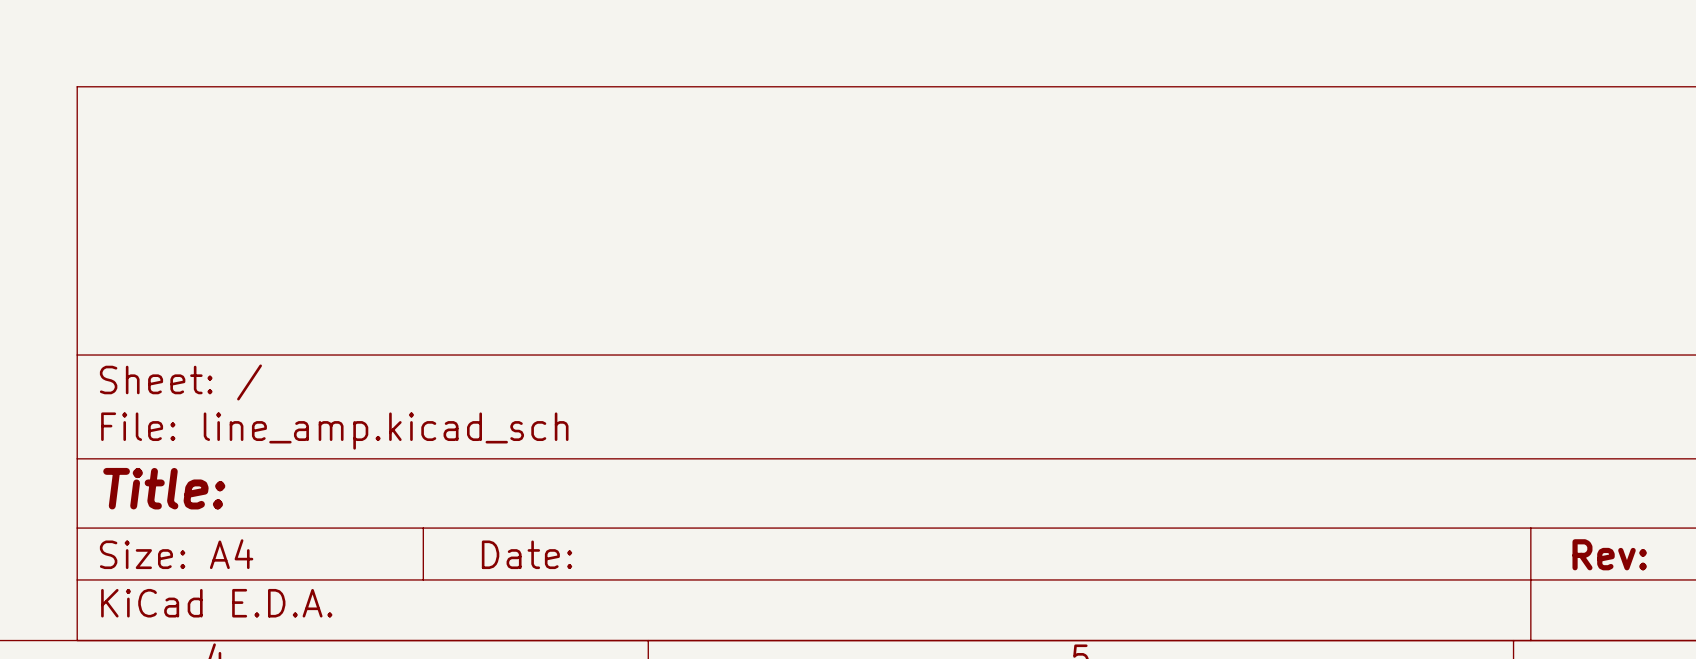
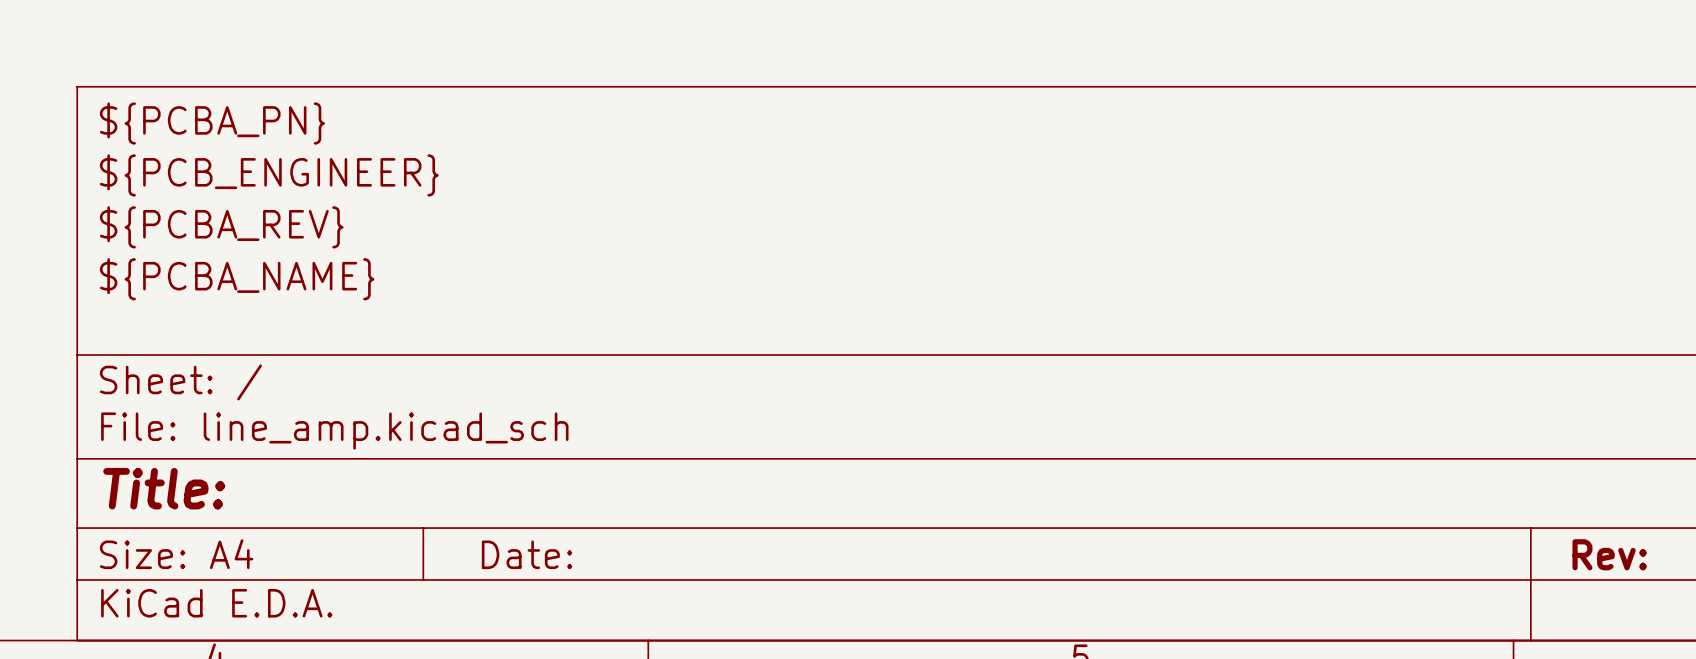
title block: none -> ${PCBA_PN} (212, 123)
title block: none -> ${PCB_ENGINEER} (269, 175)
title block: none -> ${PCBA_REV} (221, 227)
title block: none -> ${PCBA_NAME} (237, 279)

